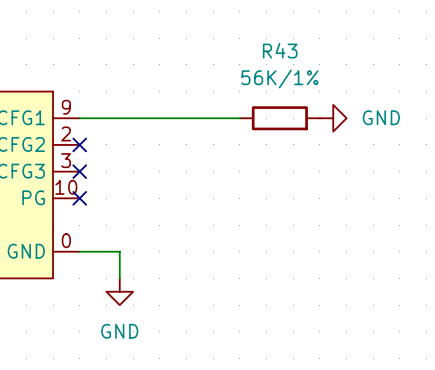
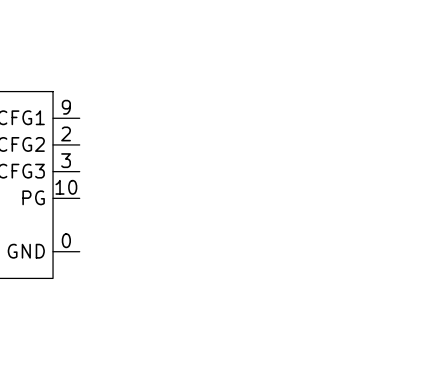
wire: (79, 118) (239, 118) -> none
R43: 56K/1% (279, 118) -> none
power symbol: GND (333, 118) -> none
no-connect mark: (79, 144) -> none
no-connect mark: (79, 171) -> none
no-connect mark: (79, 198) -> none
wire: (79, 251) (119, 251) (119, 278) -> none
power symbol: GND (119, 291) -> none

